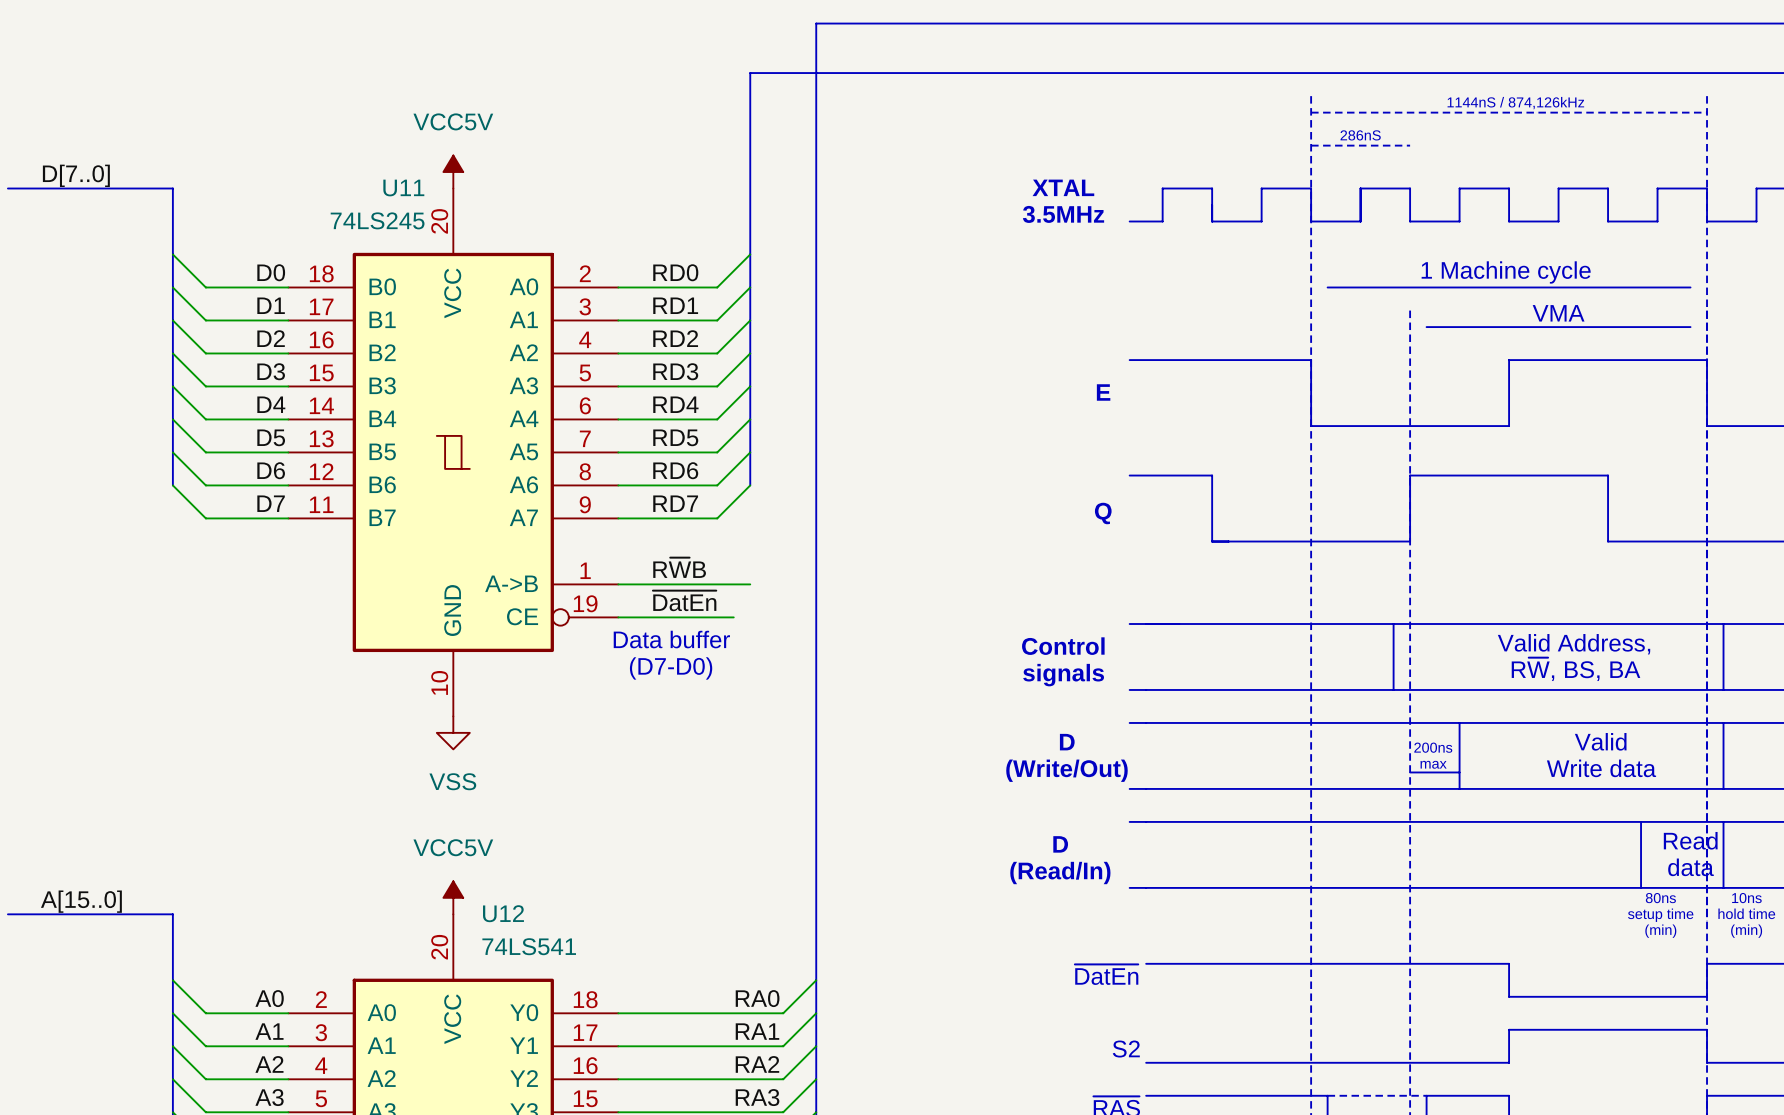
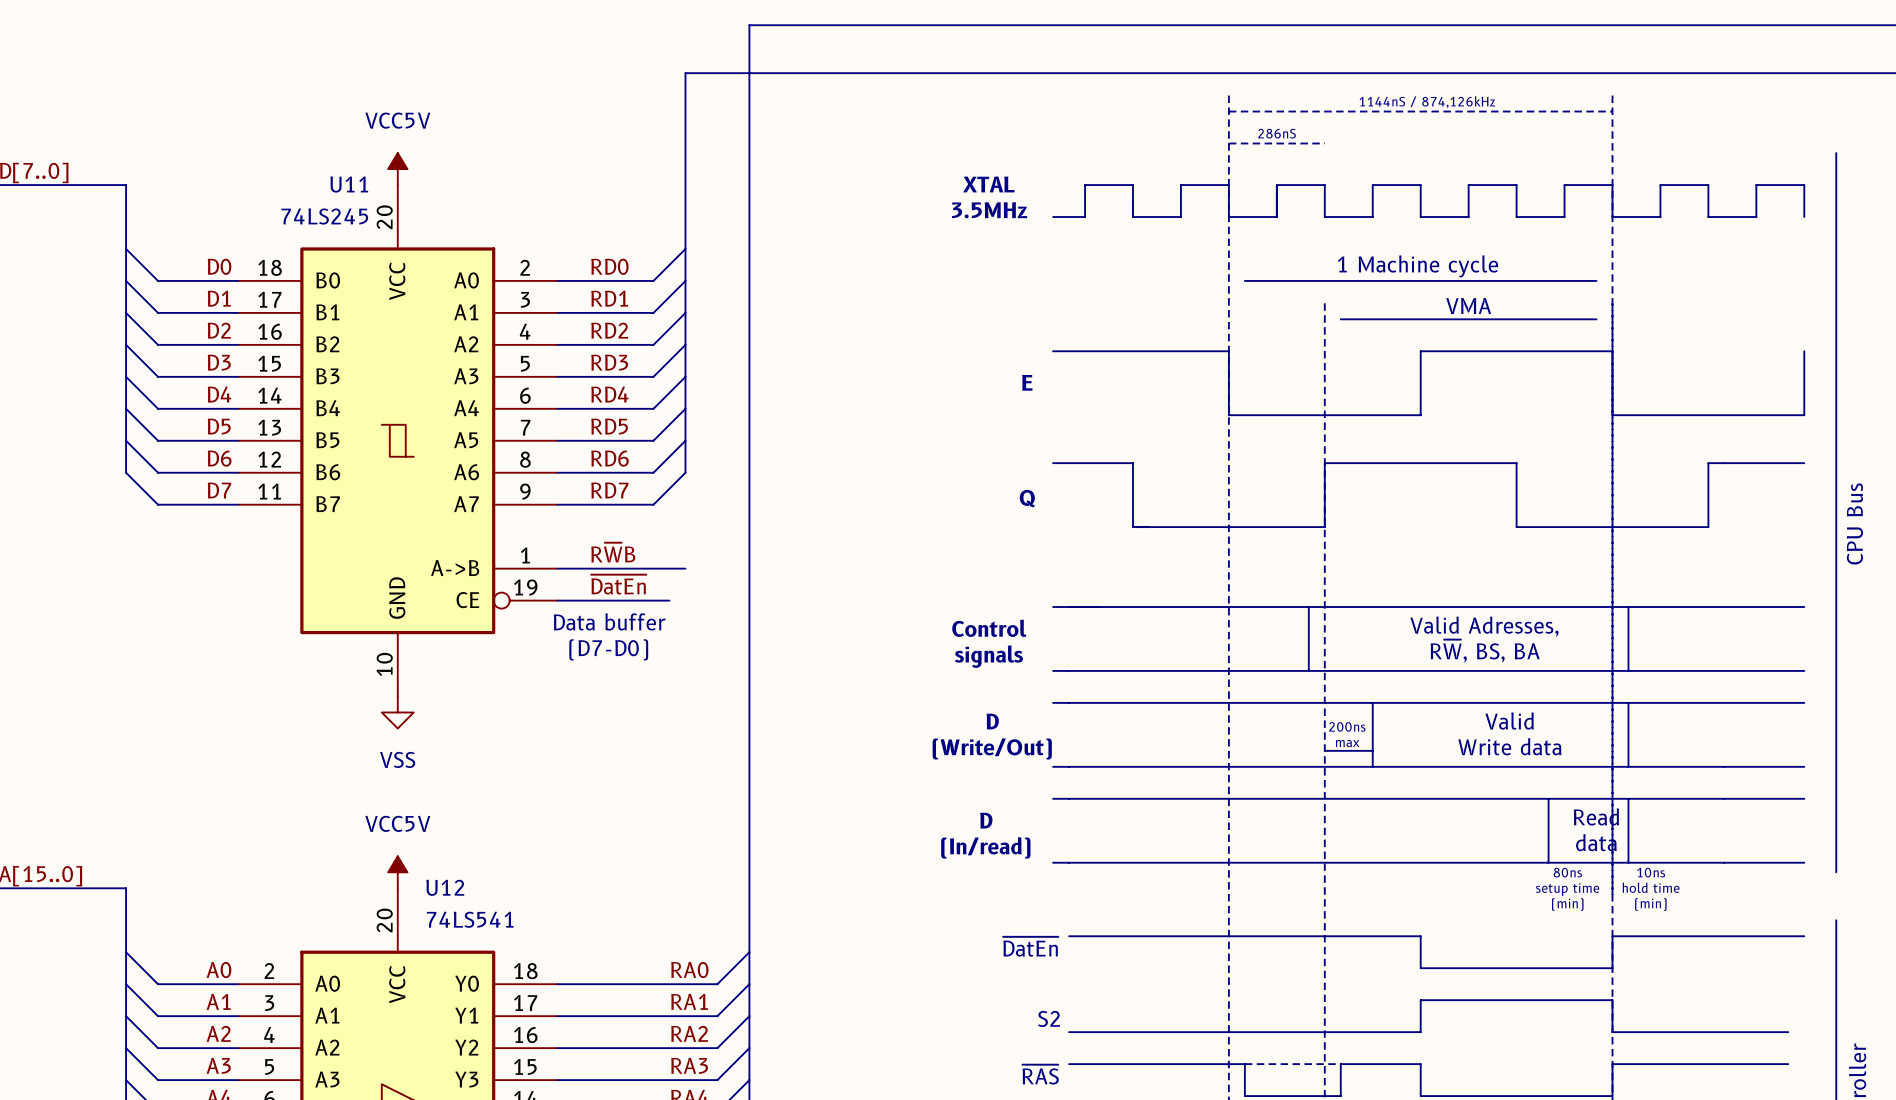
text: Valid Address, (1574, 644) -> Valid Adresses, (1484, 626)
text: (Read/In) (1060, 873) -> (In/read) (985, 847)

